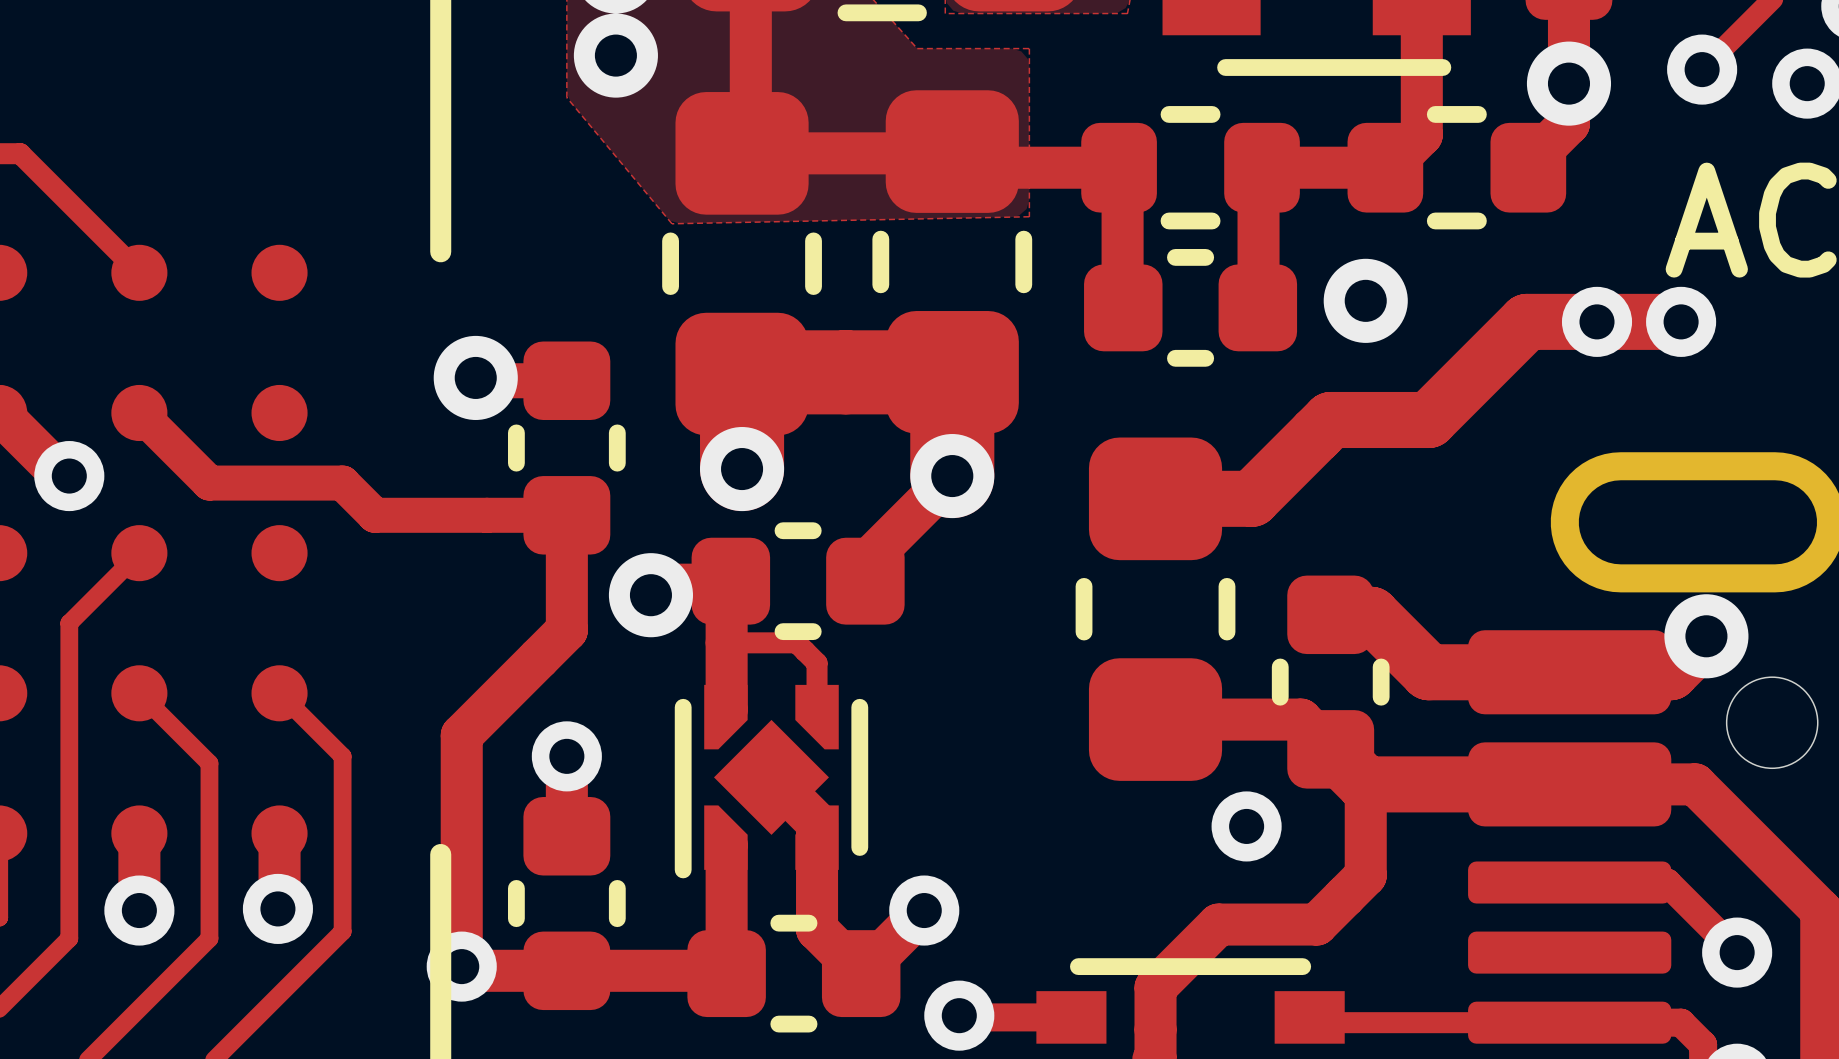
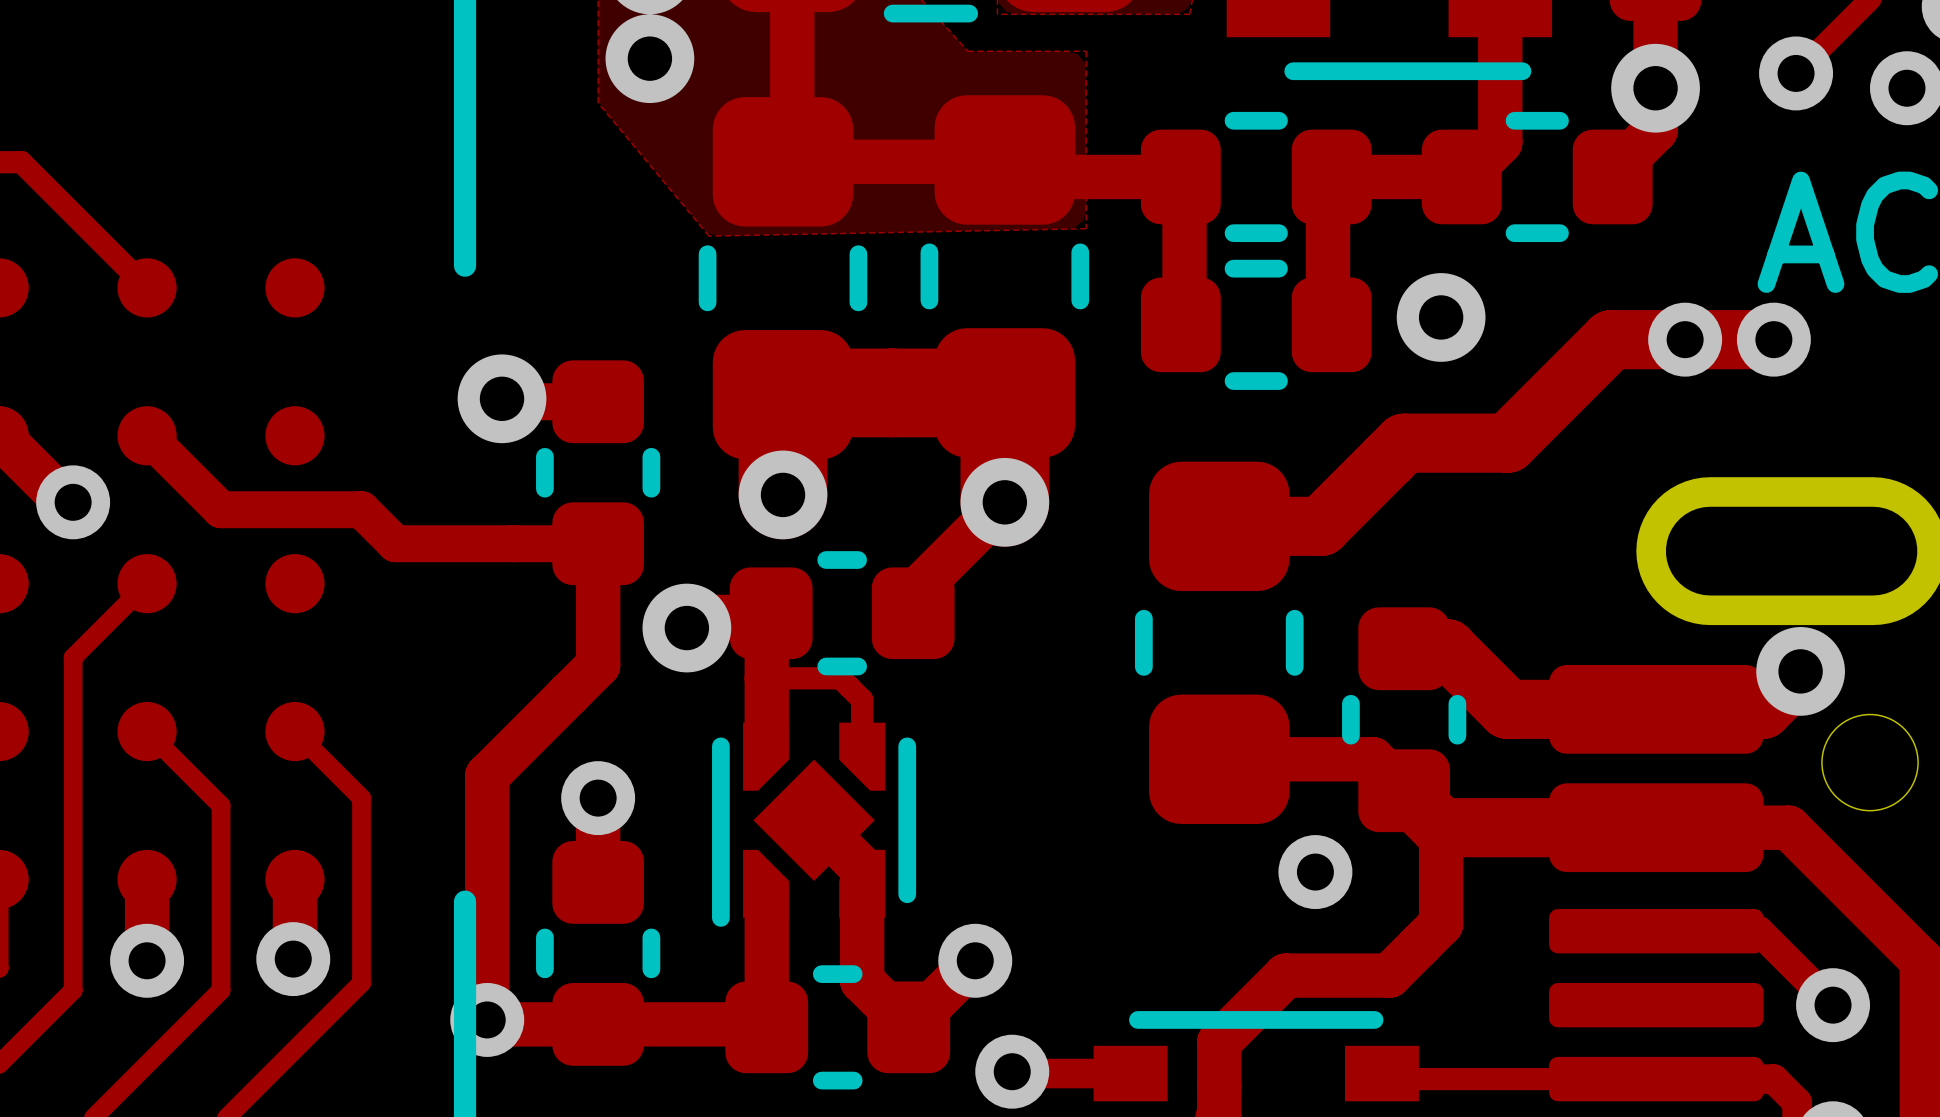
part footprint: [1084, 249, 1298, 367] -> [1140, 259, 1372, 390]

